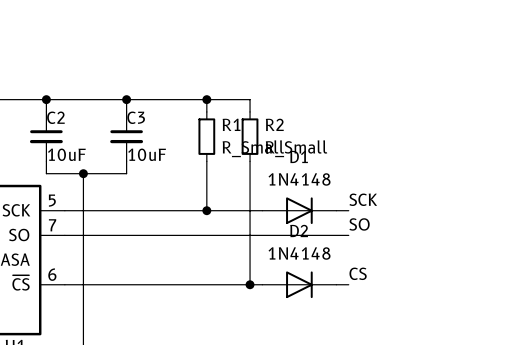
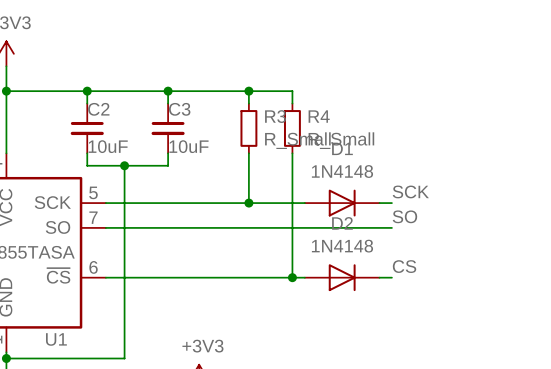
R1 name: R1 (231, 124) -> R3 (275, 116)
R2 name: R2 (274, 124) -> R4 (319, 116)

